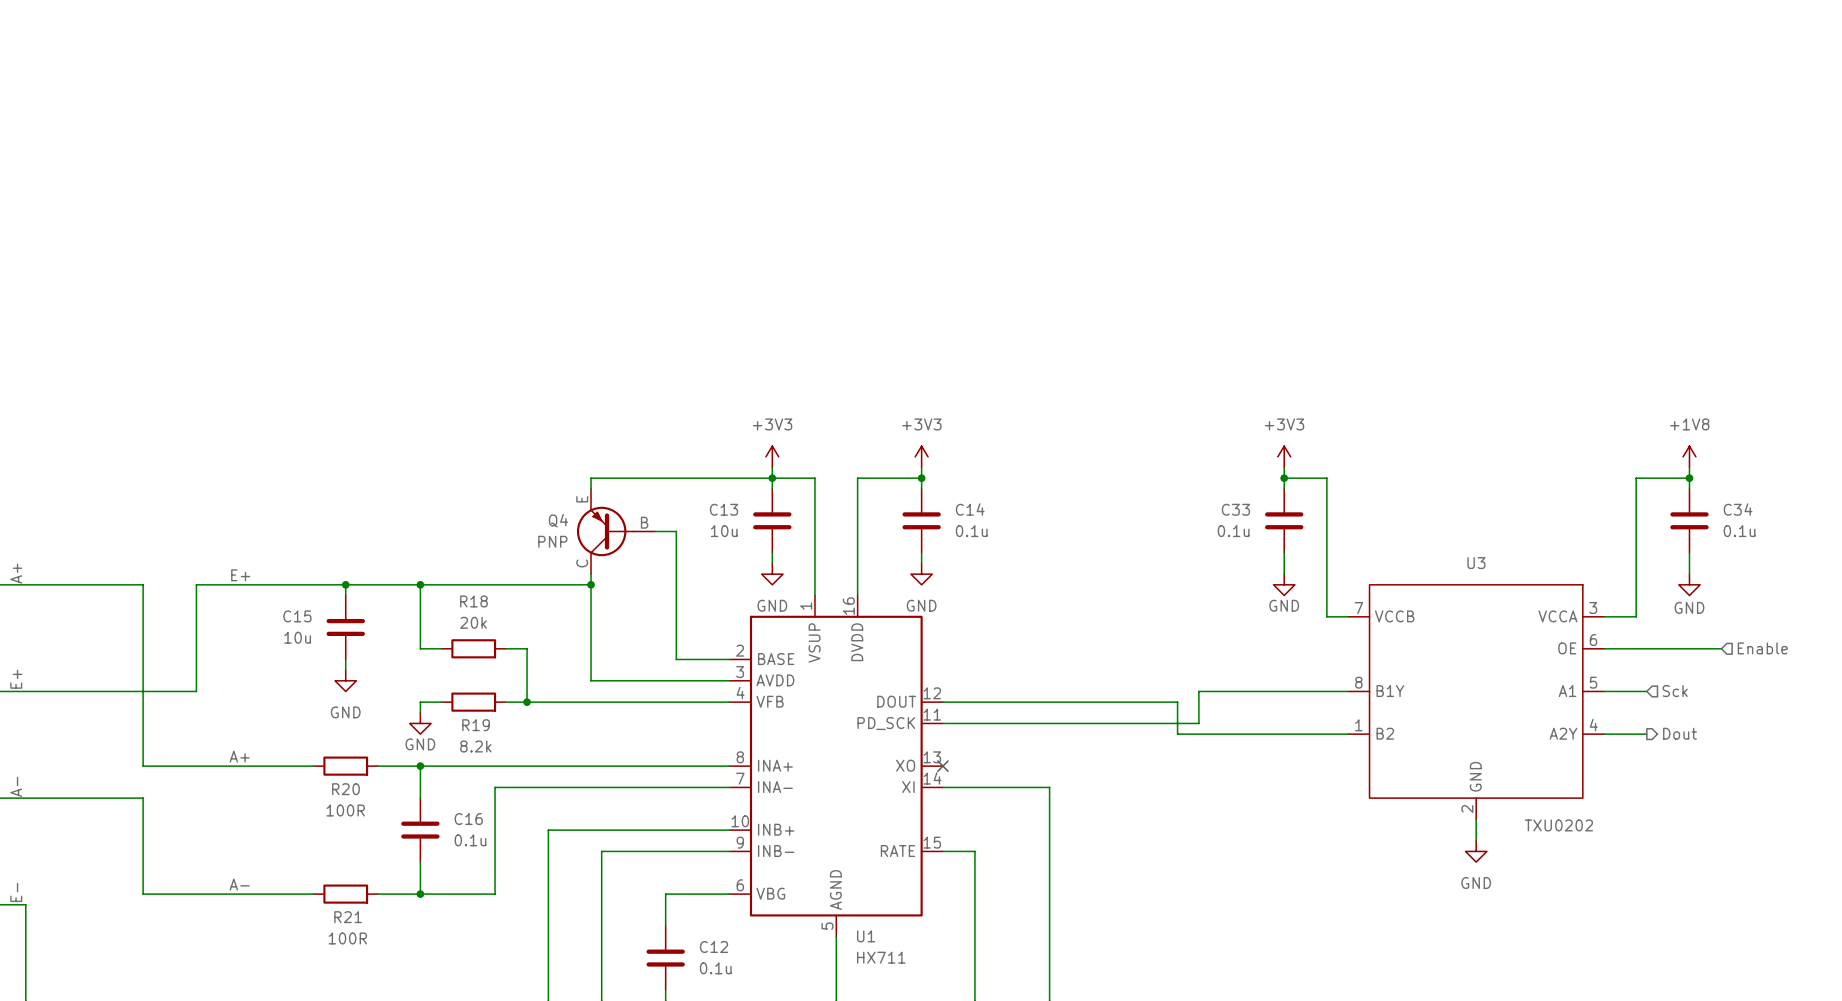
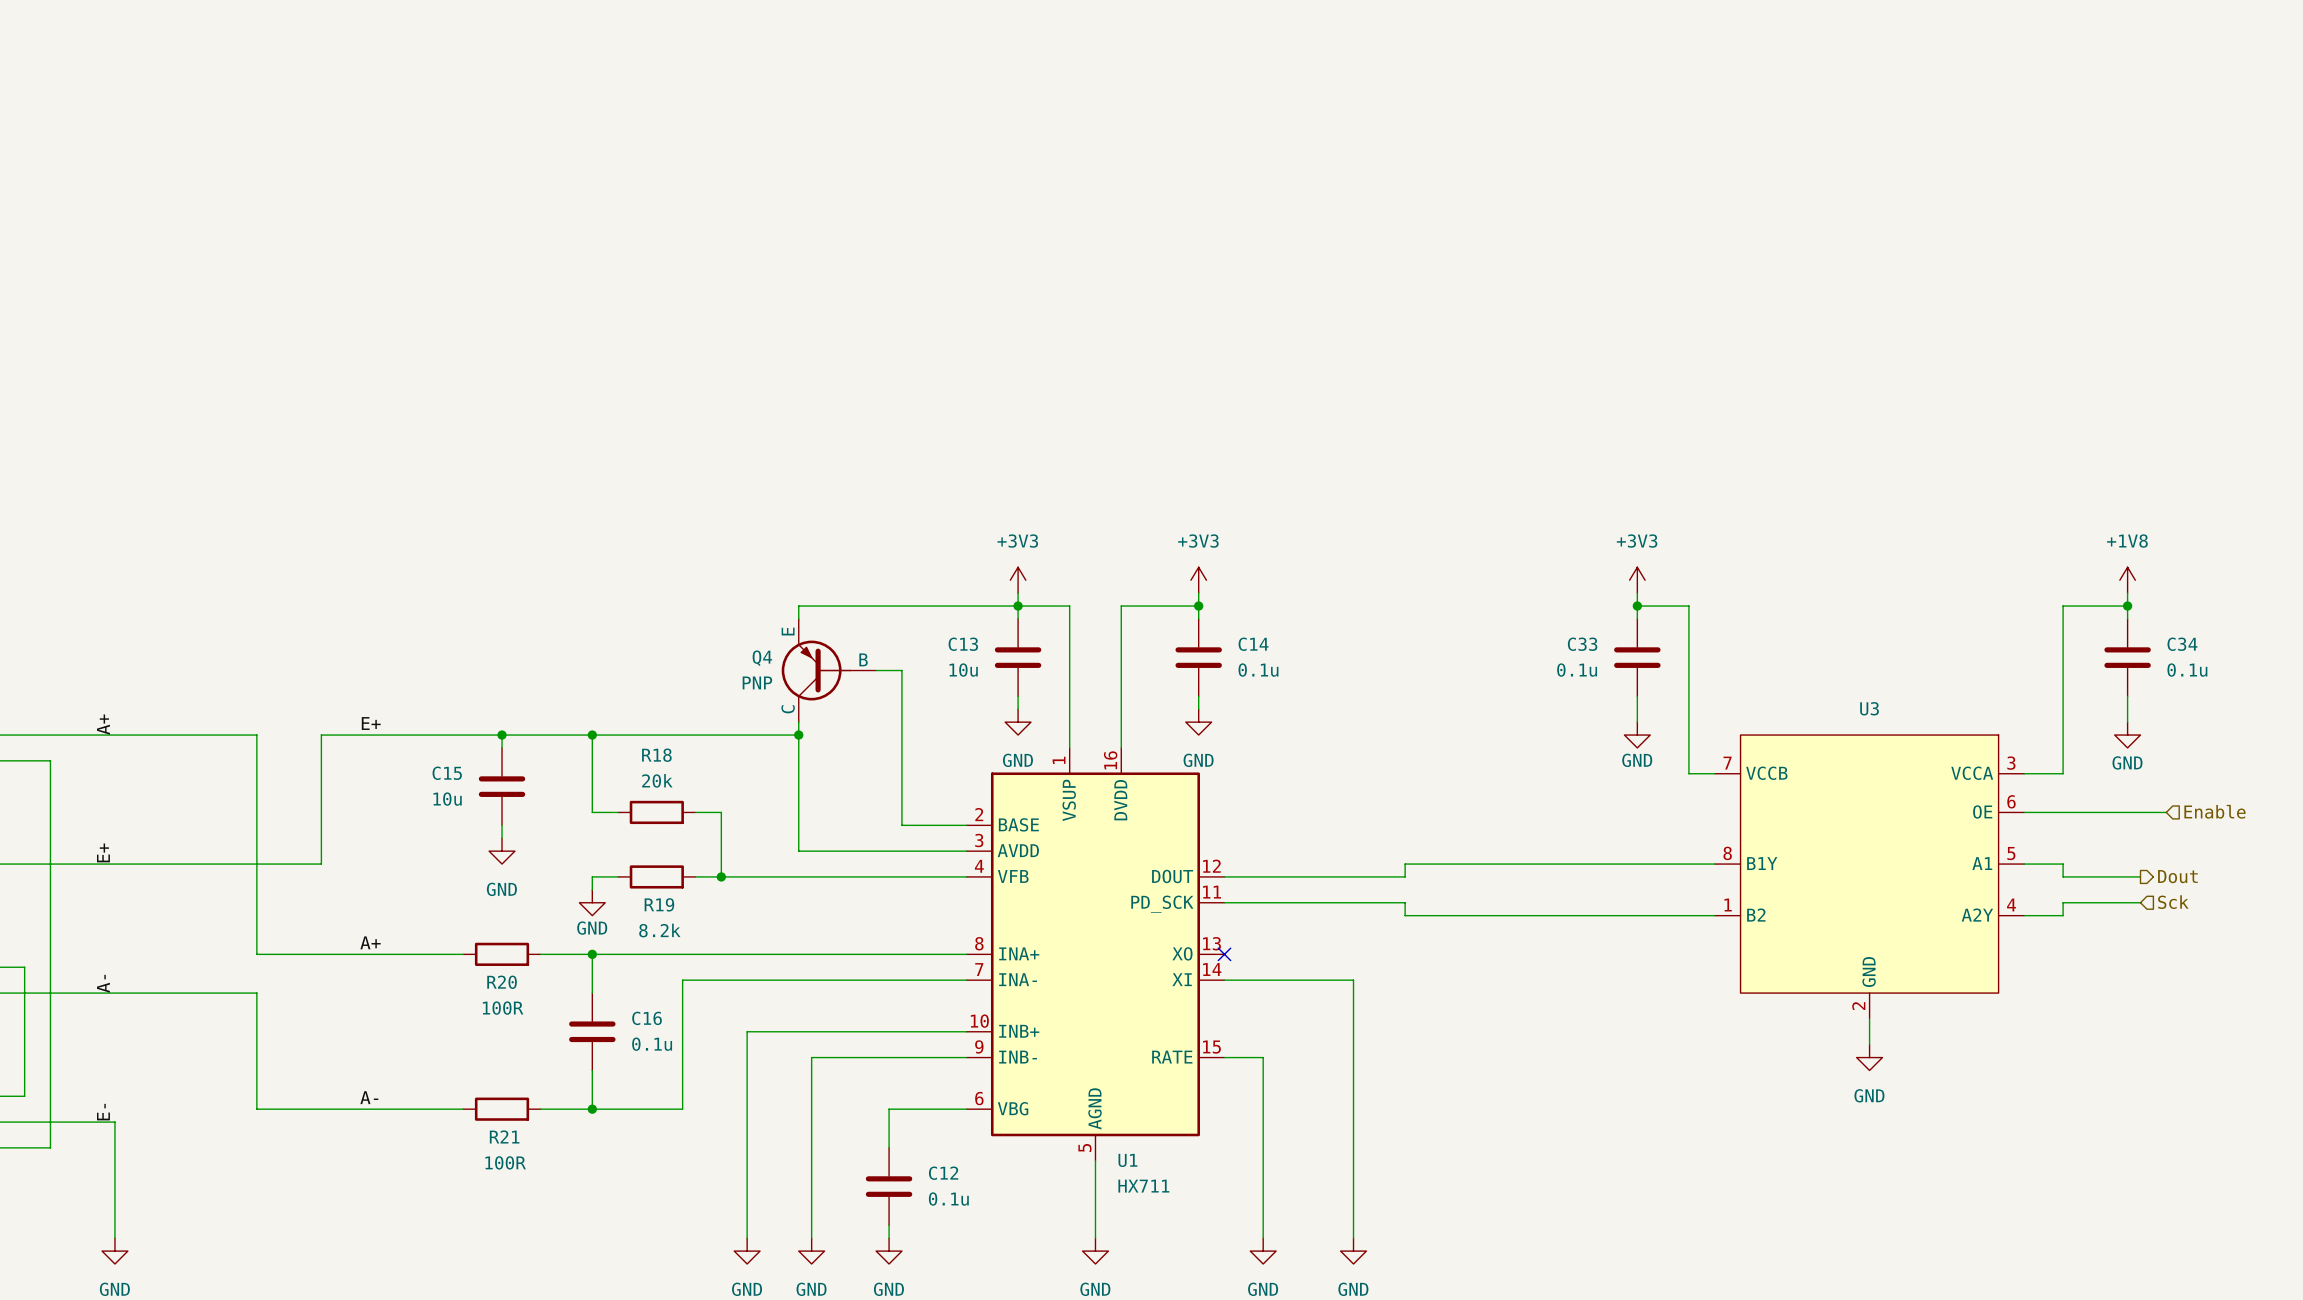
wire: (1198, 691) (1198, 723) (1092, 723) -> (1534, 864) (1405, 864) (1405, 876)
wire: (1636, 691) (1646, 691) -> (2063, 864) (2063, 876) (2140, 876)
hierarchical label position: Sck (1675, 691) -> Sck (2173, 902)
wire: (1092, 702) (1177, 702) (1177, 734) -> (1405, 902) (1405, 915) (1508, 915)
hierarchical label position: Dout (1680, 733) -> Dout (2177, 876)
wire: (1636, 734) (1646, 734) -> (2063, 915) (2063, 902) (2140, 902)
U3 value: TXU0202 (1558, 825) -> none

